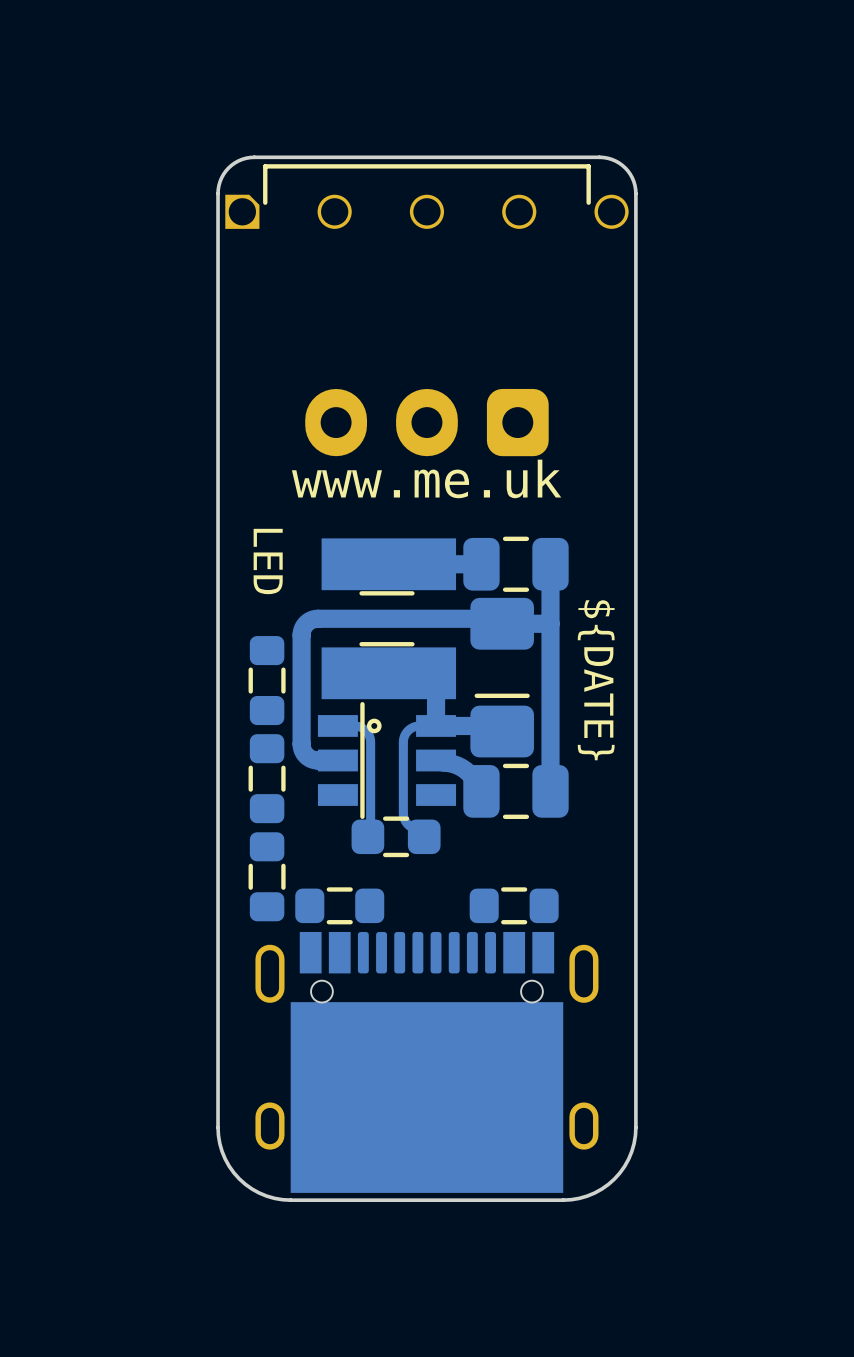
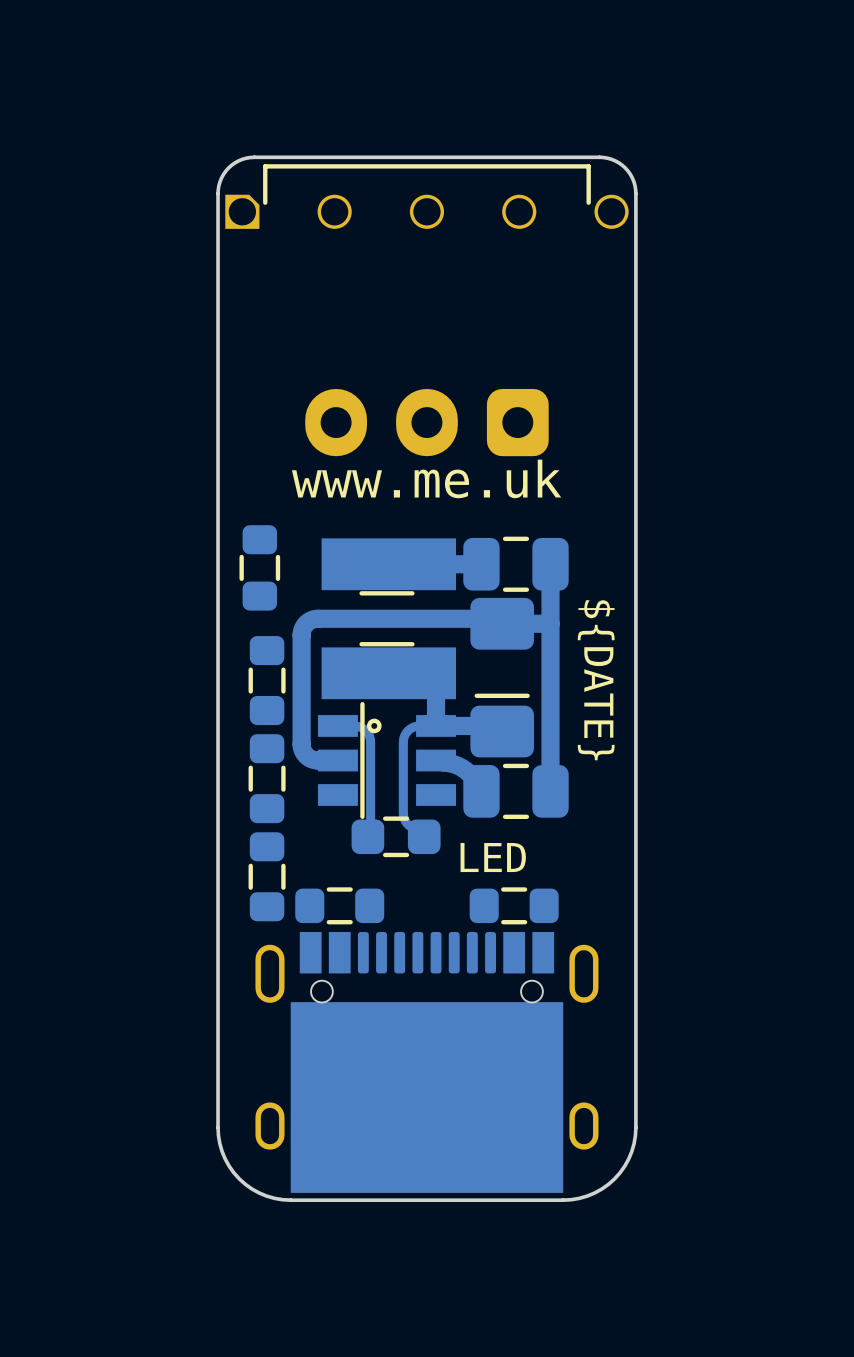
text rotation: 0° (268, 561) -> 90° counterclockwise (493, 857)
text position: LED (268, 561) -> LED (493, 857)
part: none -> (259, 567)

